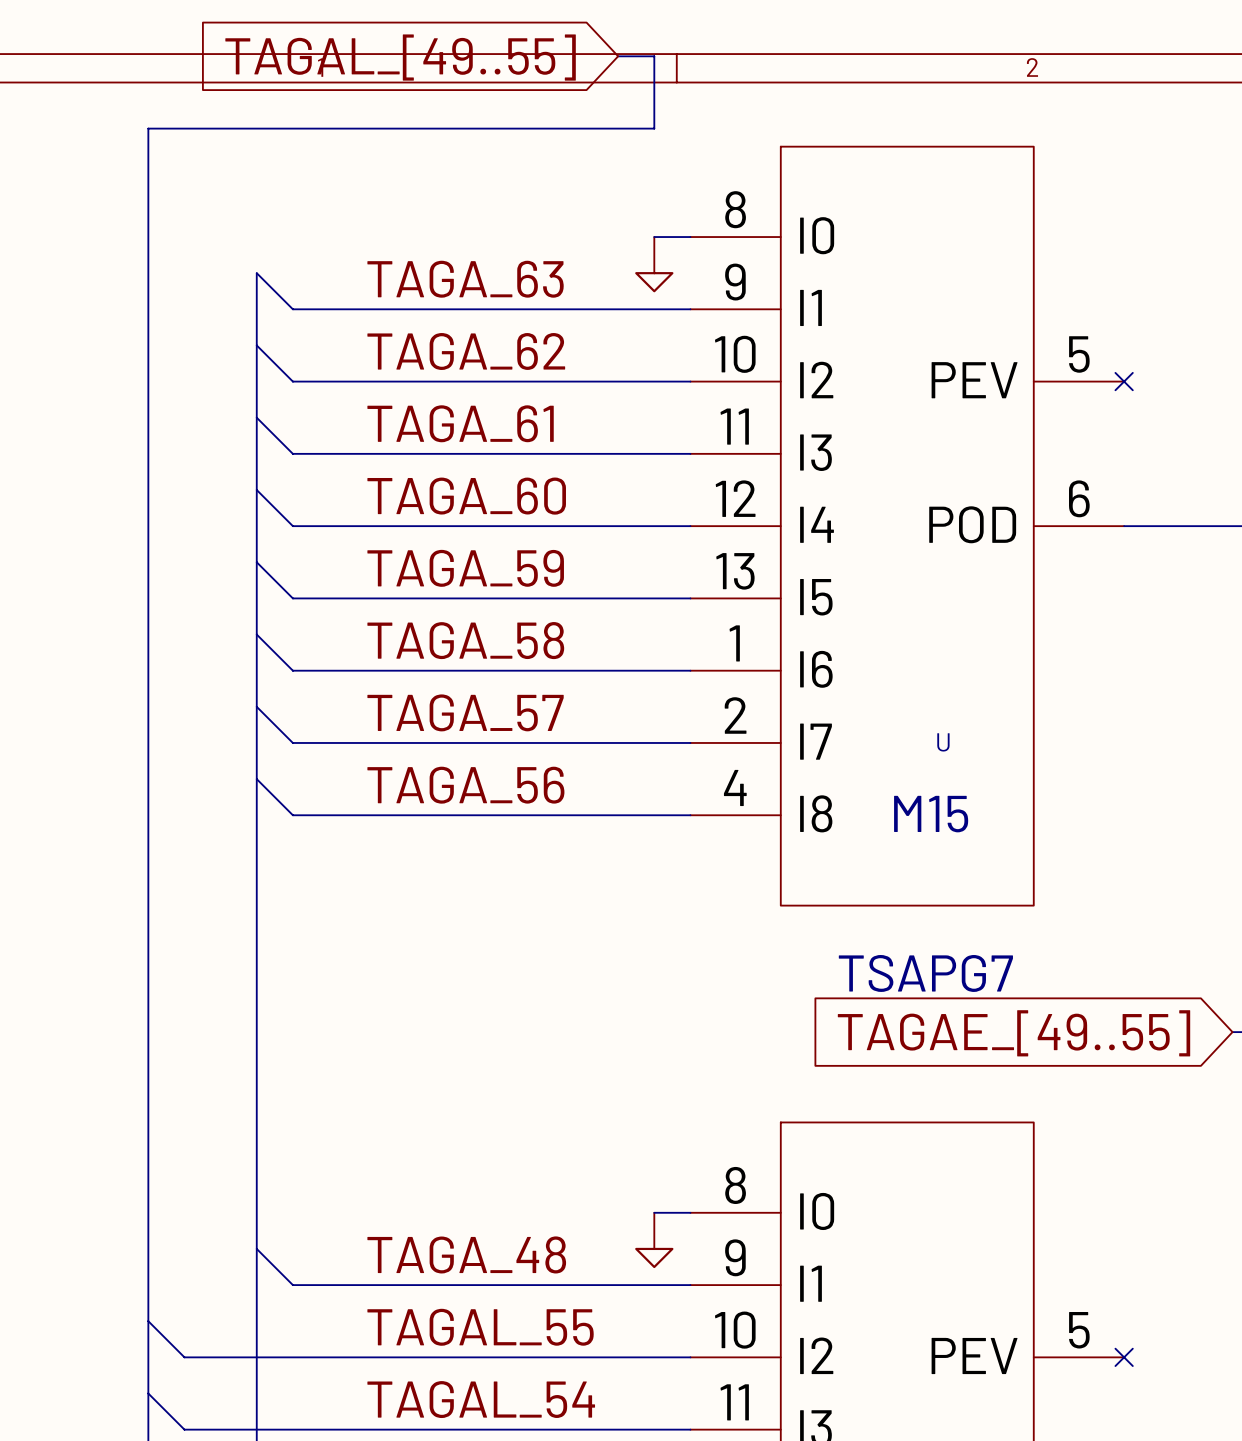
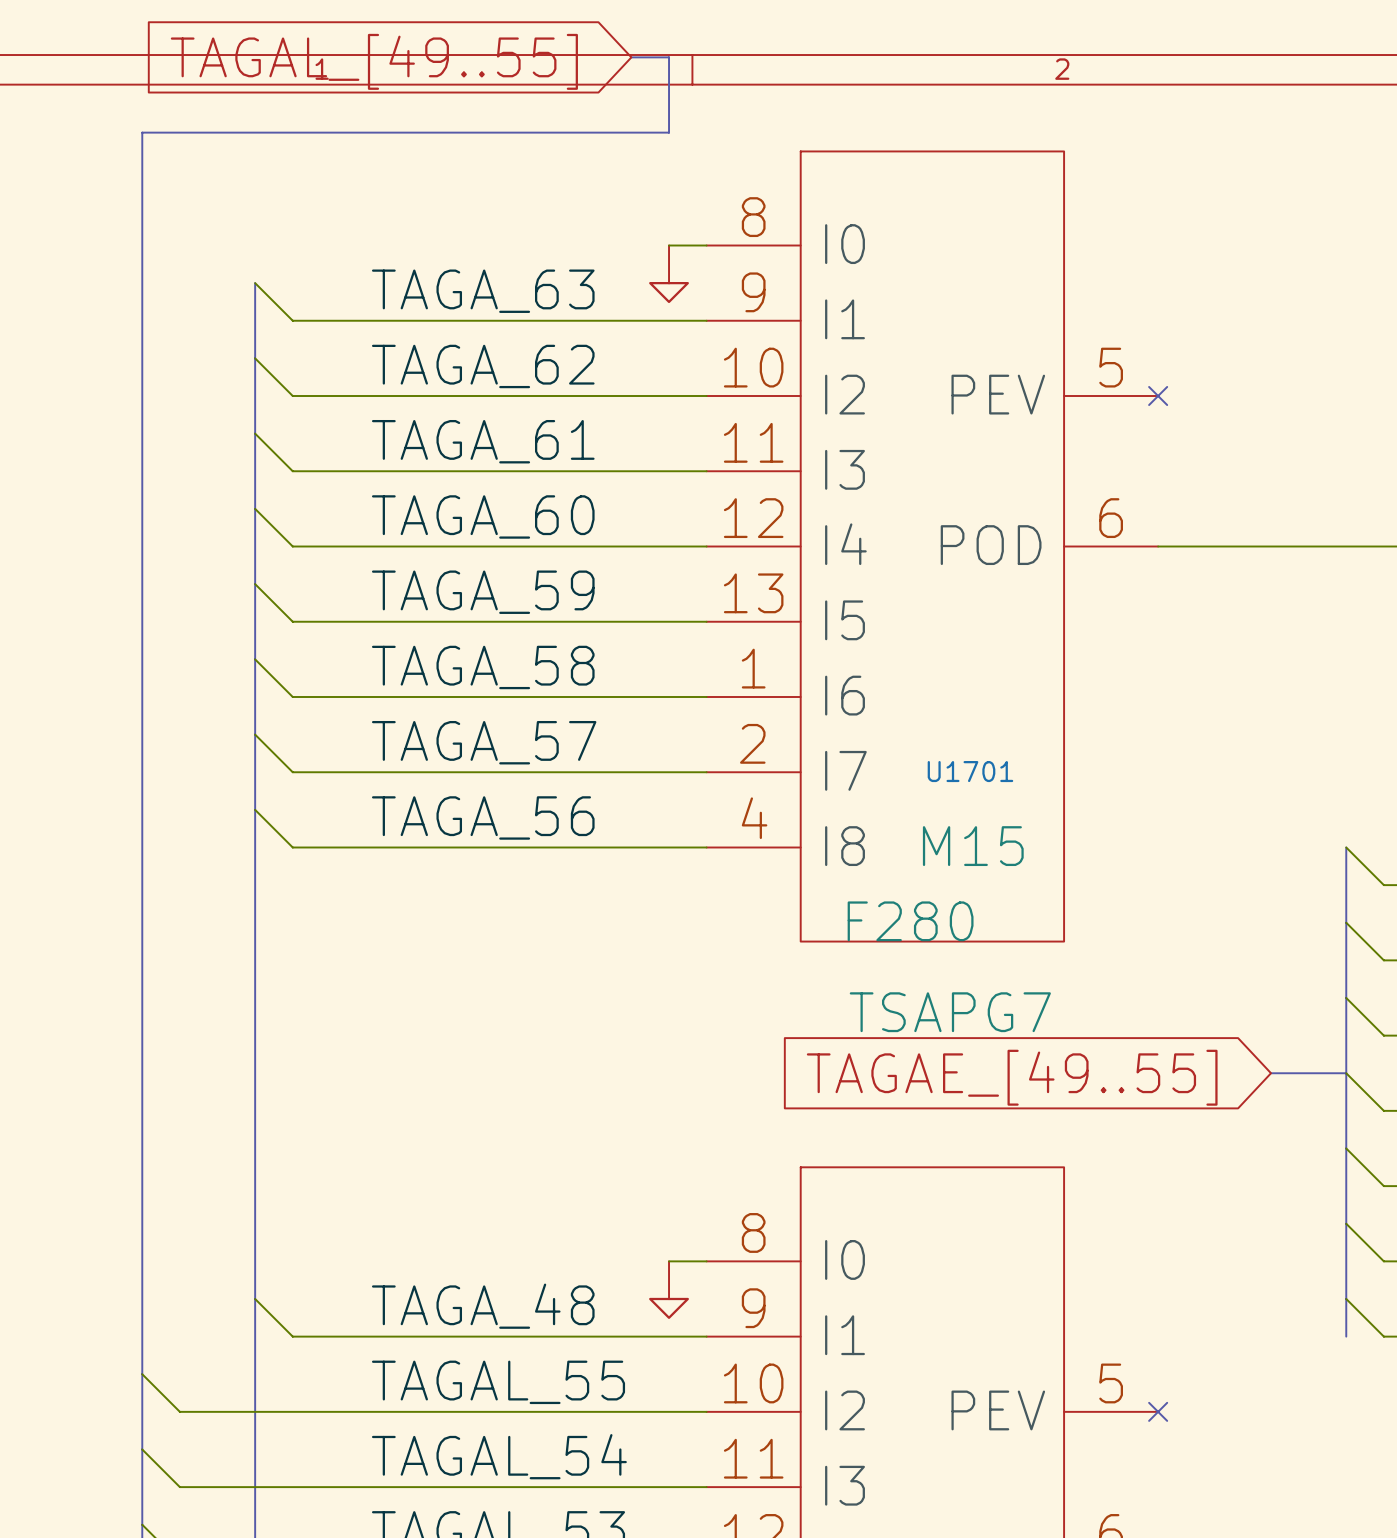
U name: U (943, 742) -> U1701 (970, 771)
U value: none -> F280 (910, 921)

